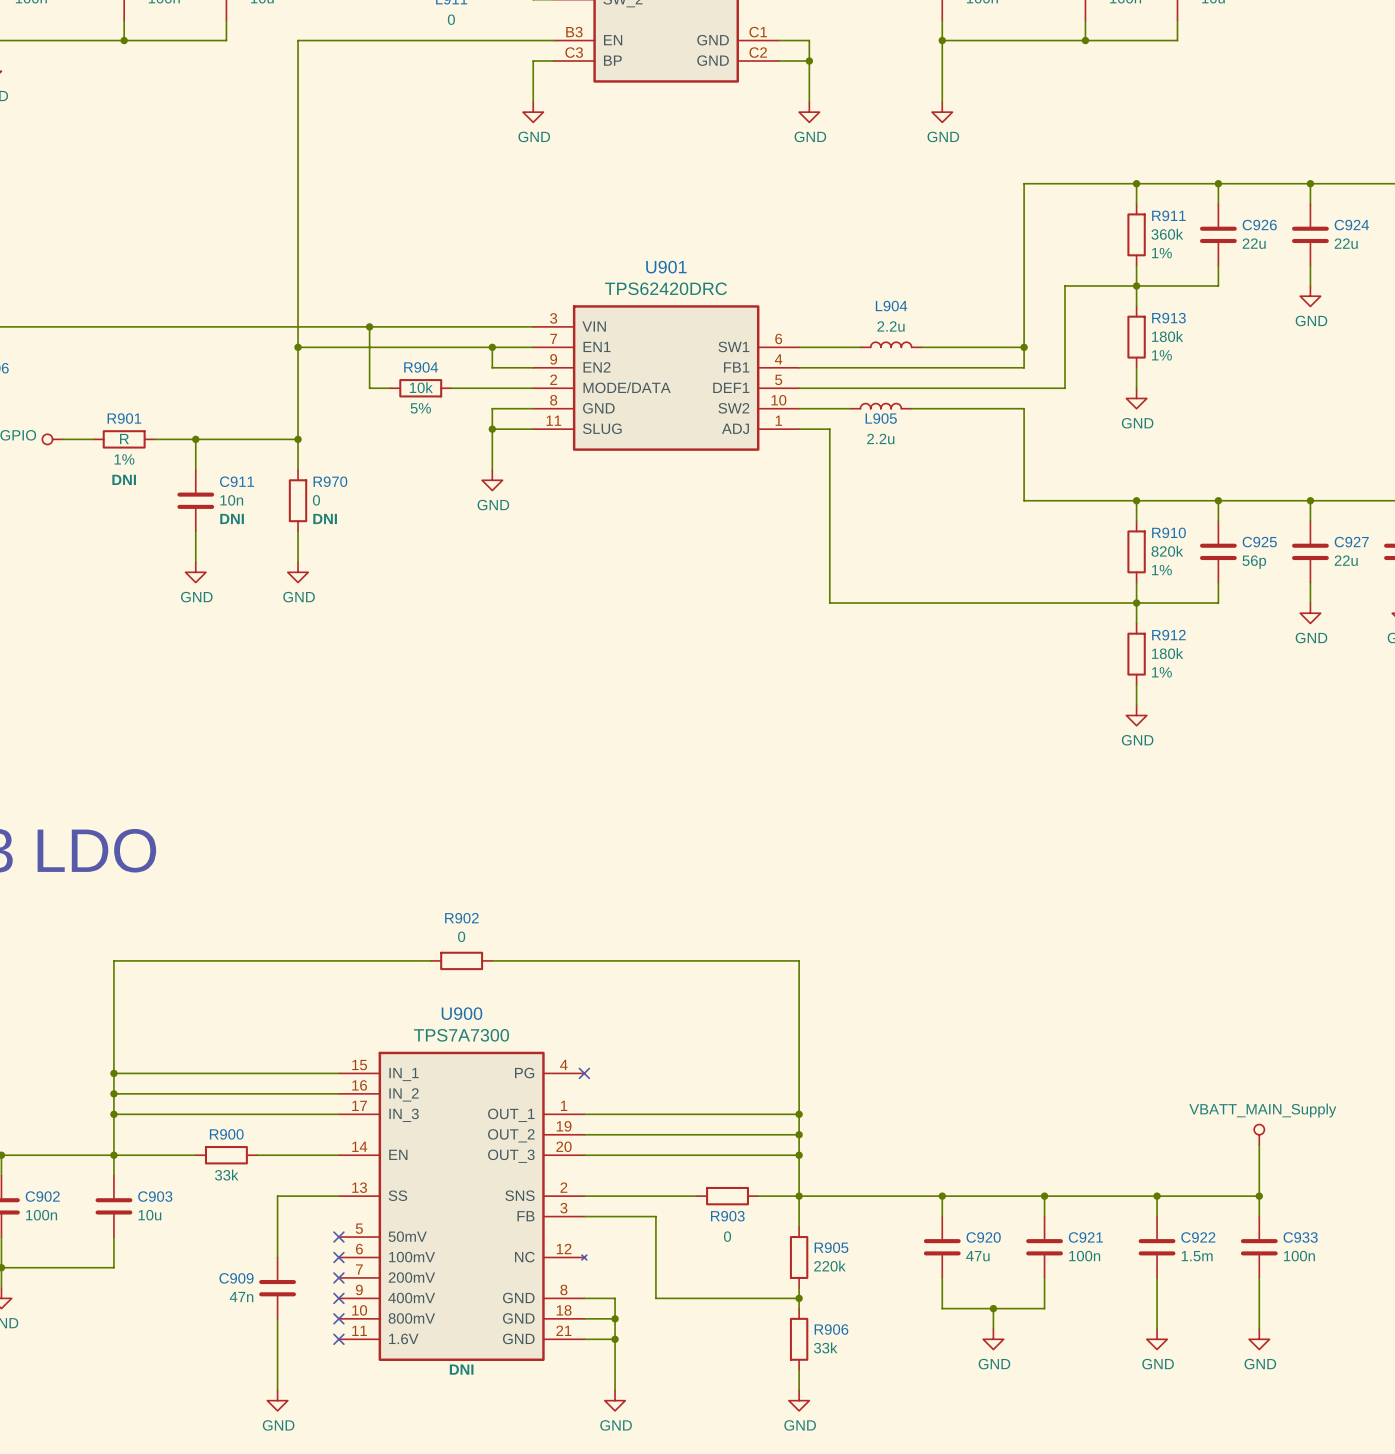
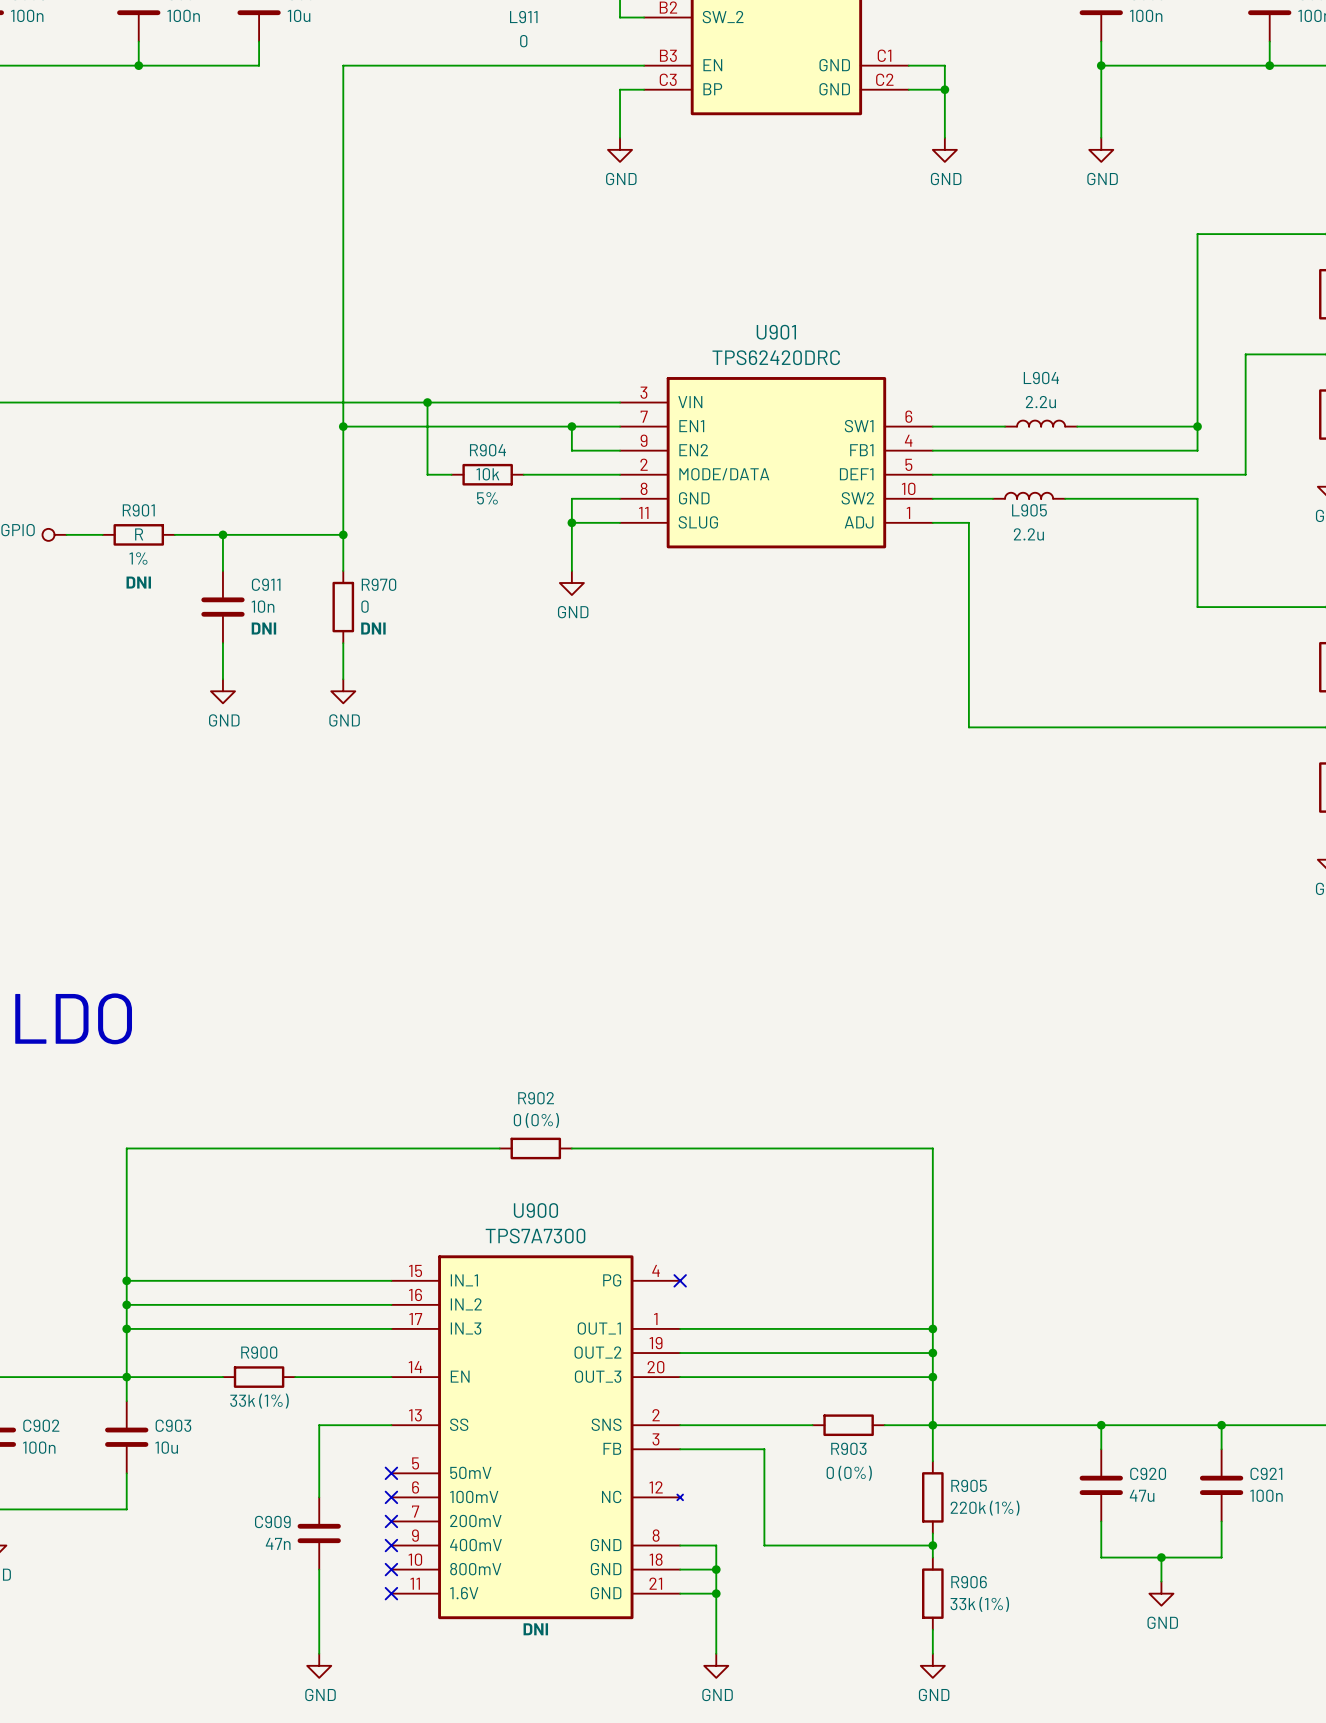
R902 value: 0 (461, 936) -> 0 (0%) (536, 1120)
R900 value: 33k (226, 1175) -> 33k (1%) (259, 1401)
R903 value: 0 (727, 1236) -> 0 (0%) (849, 1473)
R905 value: 220k (829, 1266) -> 220k (1%) (985, 1508)
R906 value: 33k (825, 1347) -> 33k (1%) (979, 1604)

